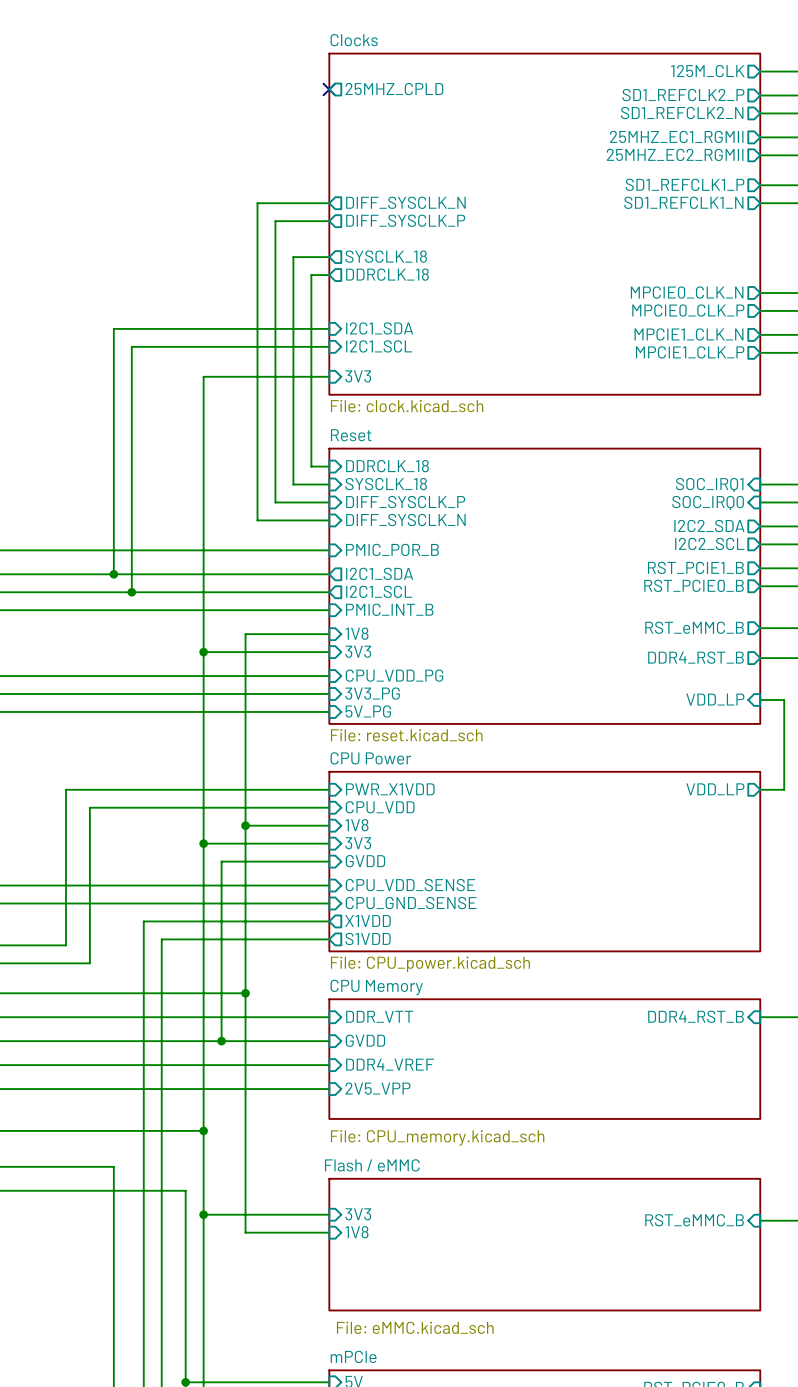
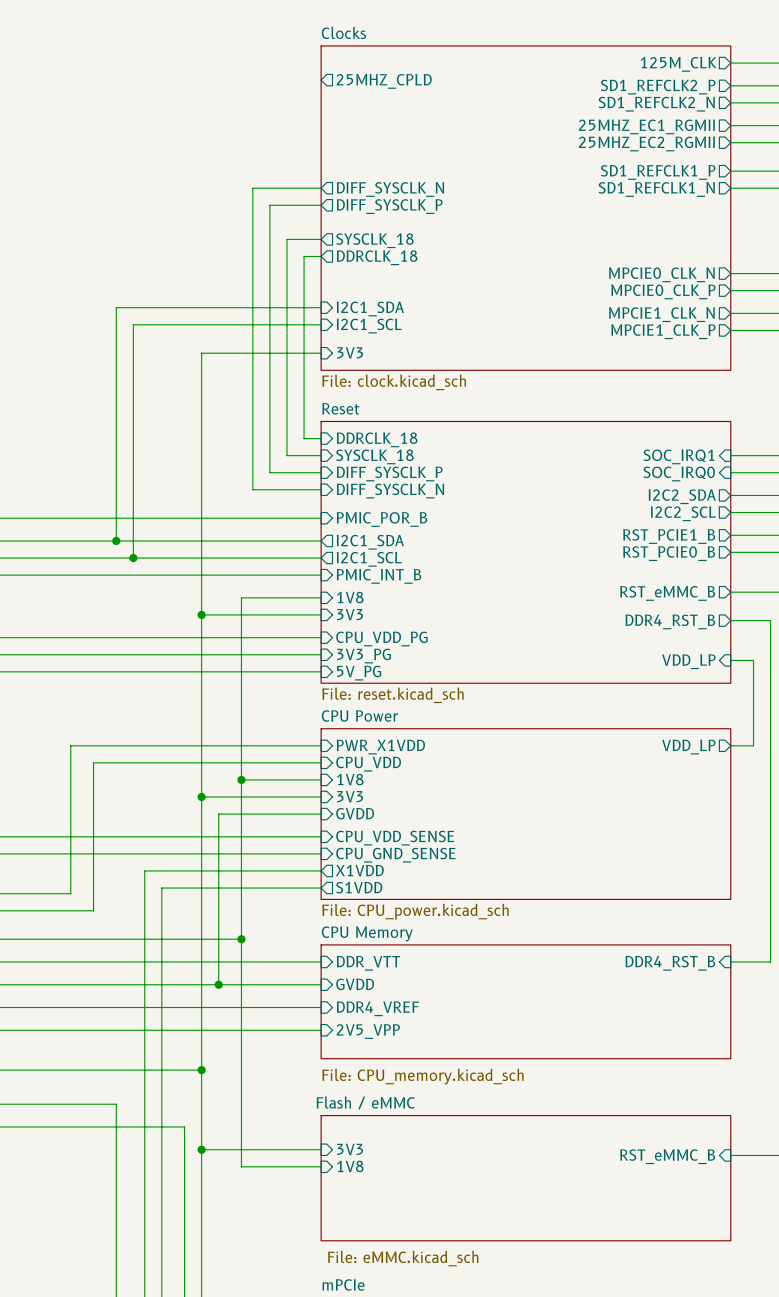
no-connect mark: (329, 89) -> none

